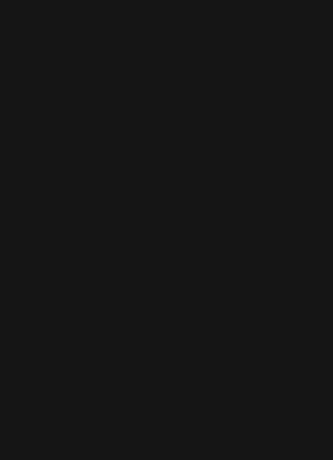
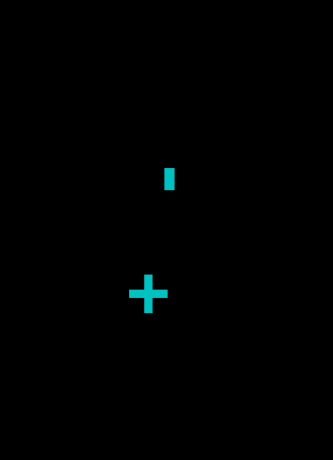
text: none -> - (169, 179)
text: none -> + (148, 293)

